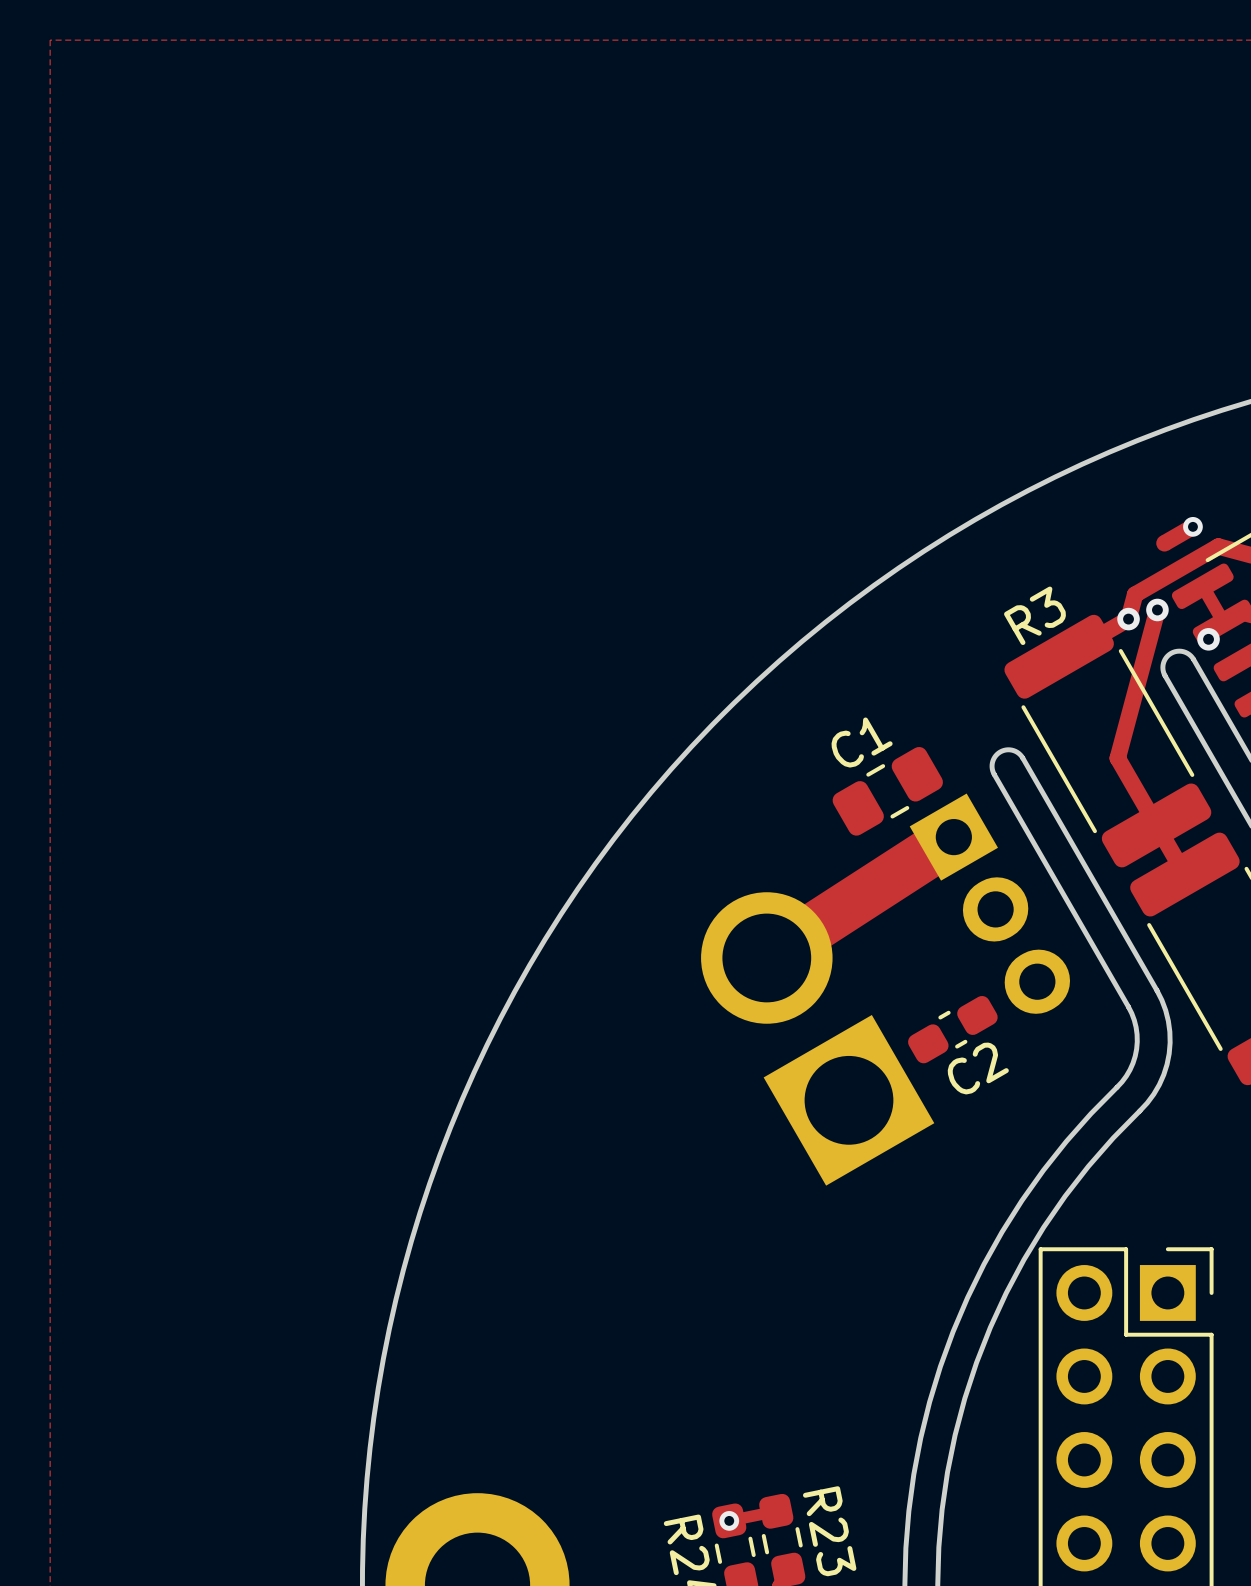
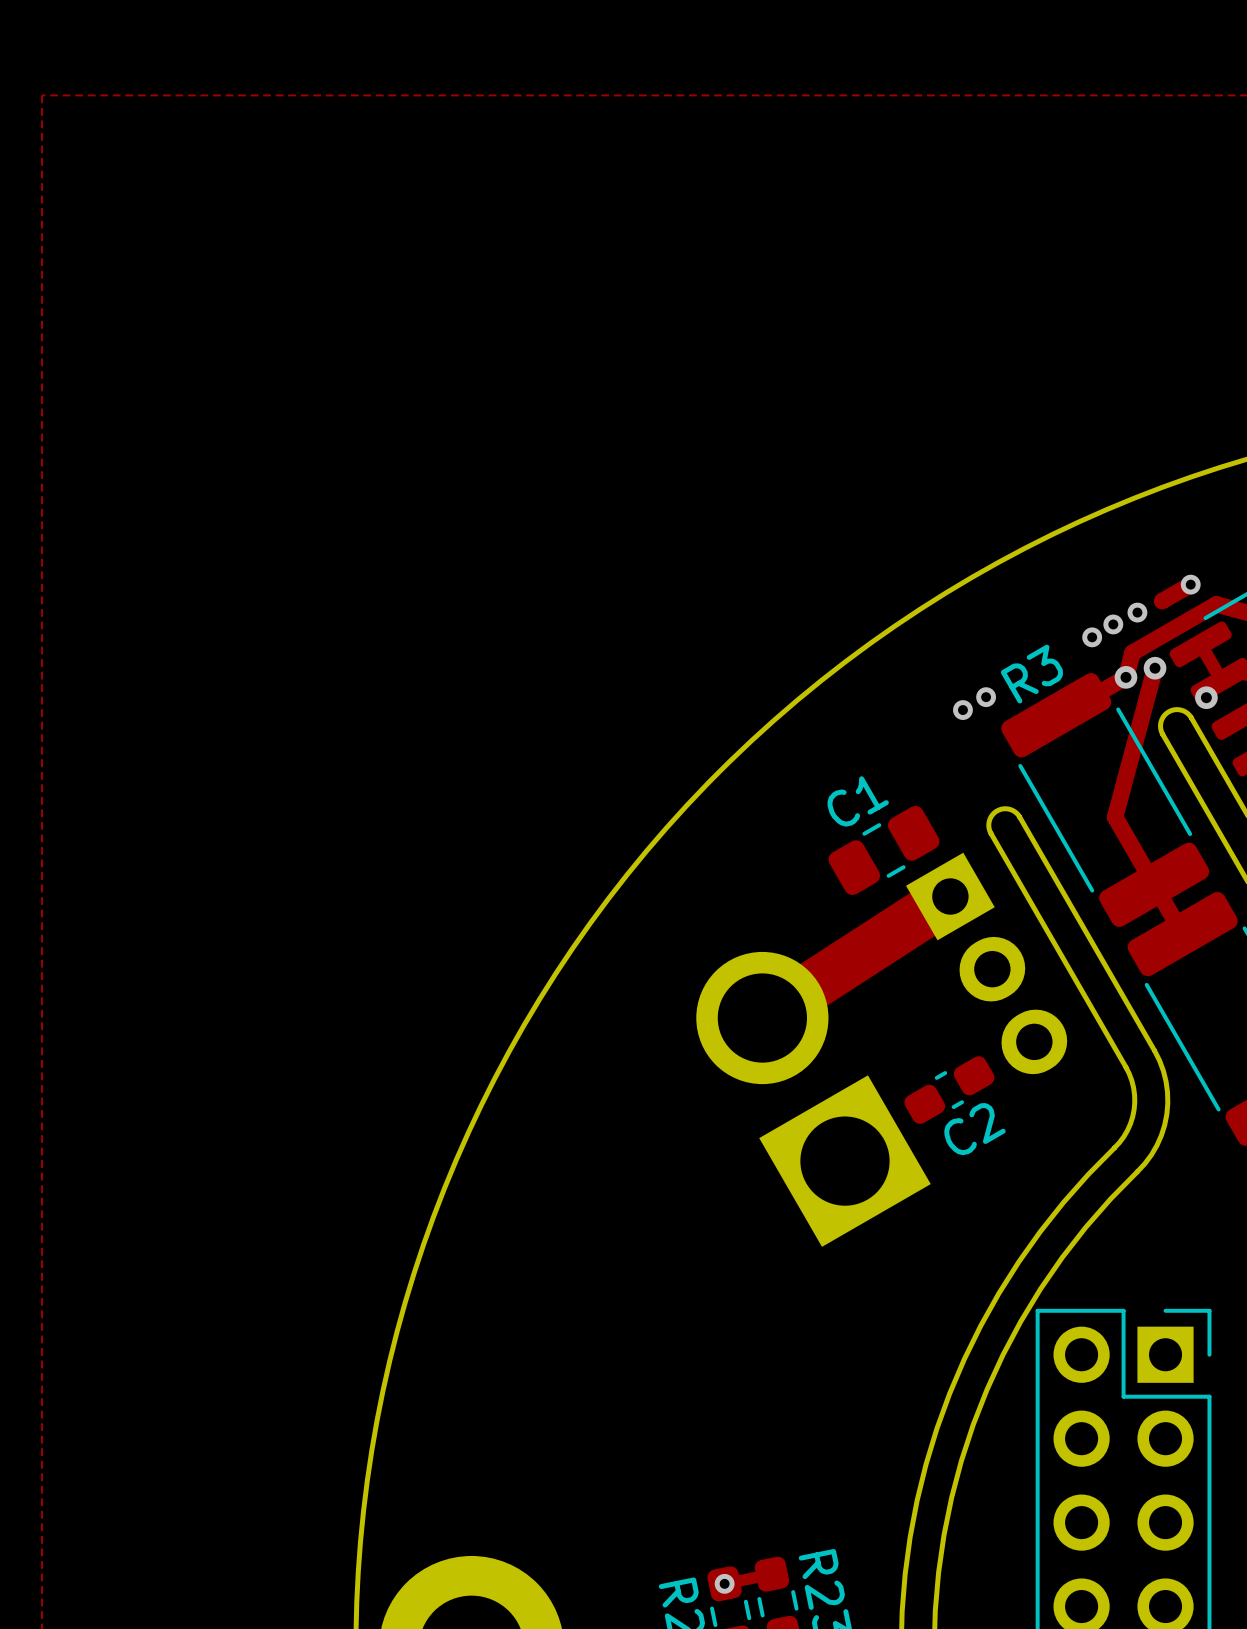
via: none -> (1137, 612)
via: none -> (1113, 624)
via: none -> (1092, 637)
via: none -> (986, 697)
via: none -> (962, 710)

